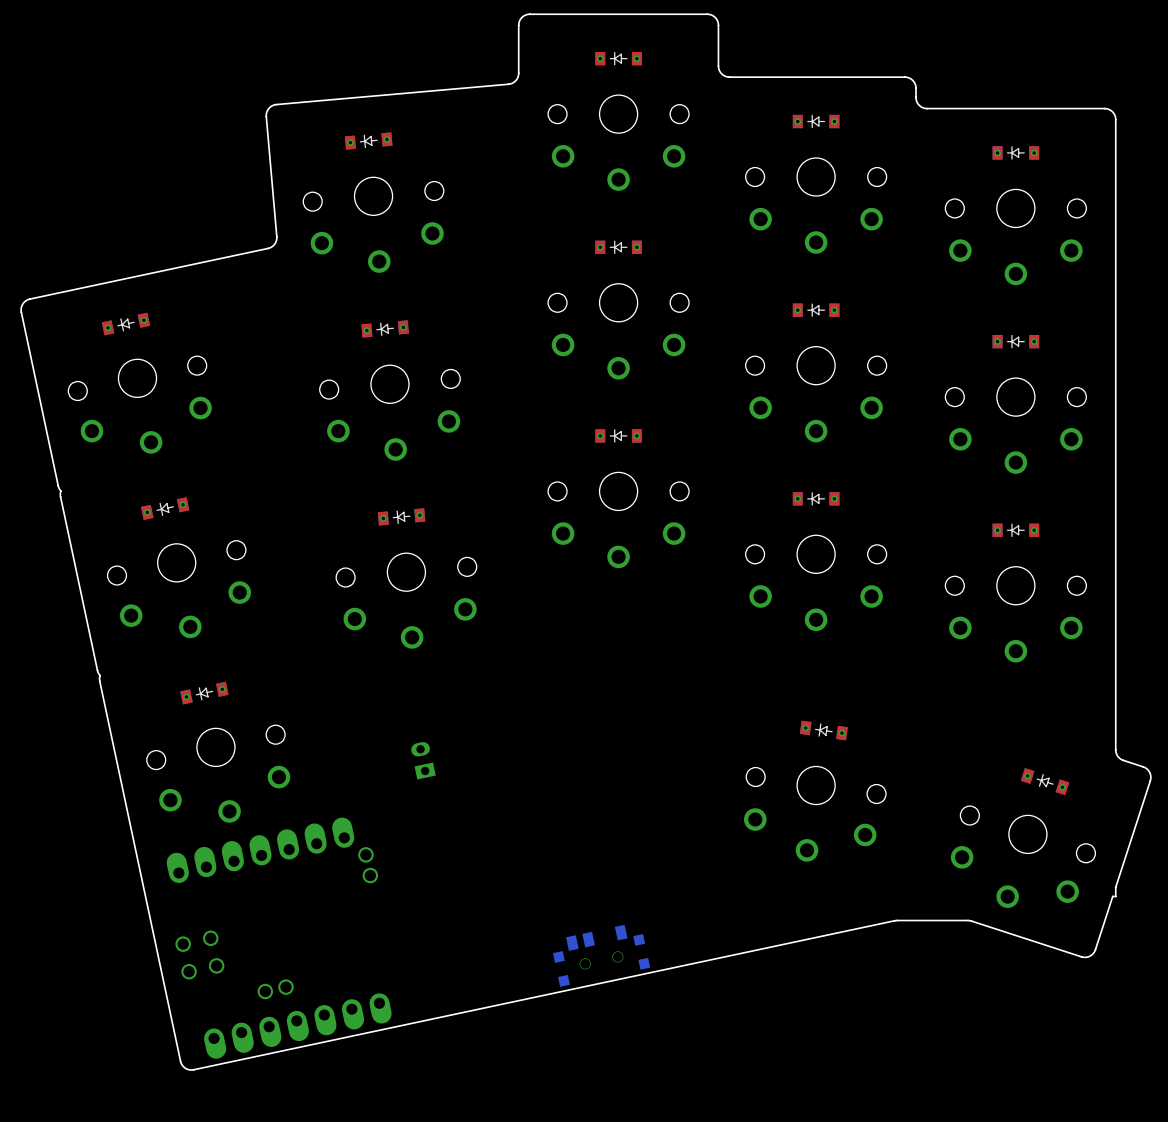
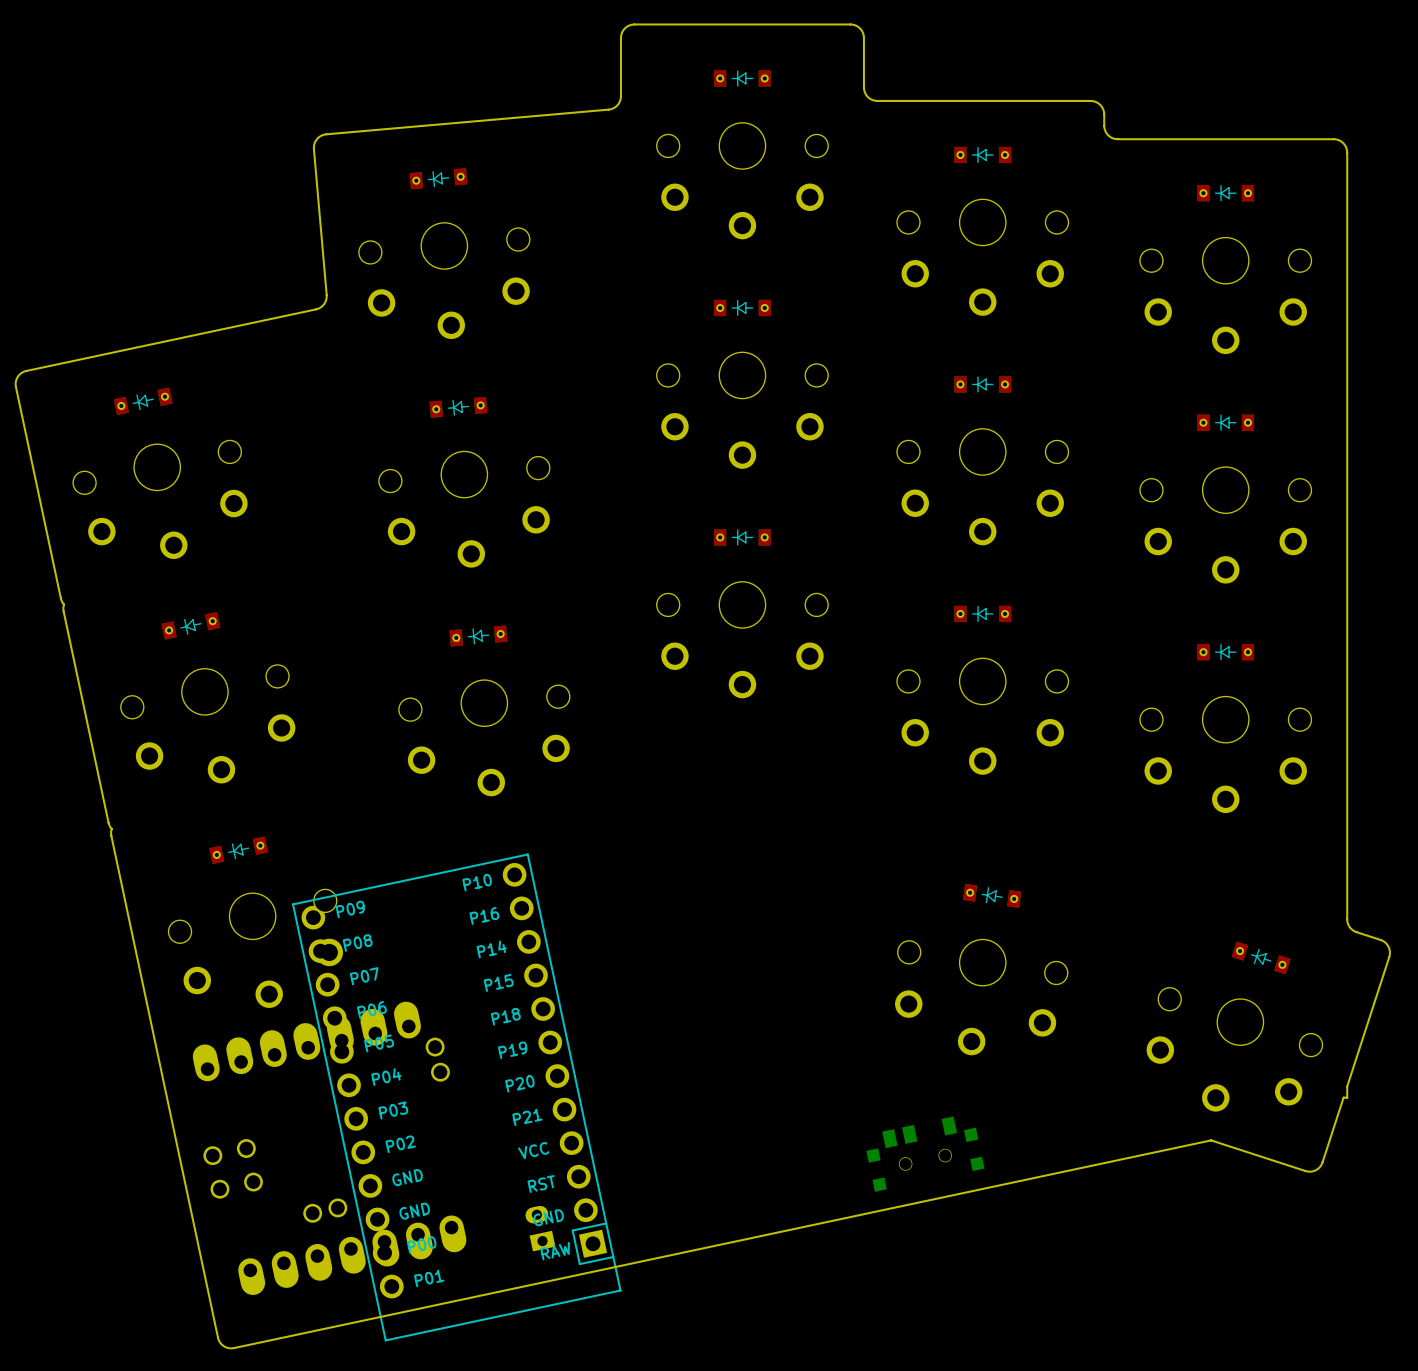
part position: (423, 760) -> (540, 1228)
part: none -> (456, 1097)
board edge: (1003, 931) (968, 920) (895, 920) (193, 1069) (185, 1068) (180, 1061) -> (1211, 1140) (234, 1348) (225, 1346) (218, 1340) (209, 1298)
part position: (601, 955) -> (925, 1154)

